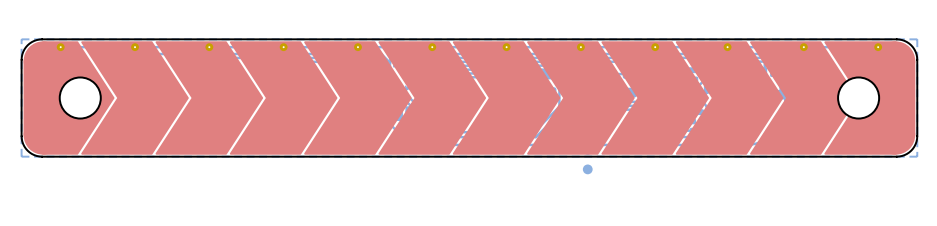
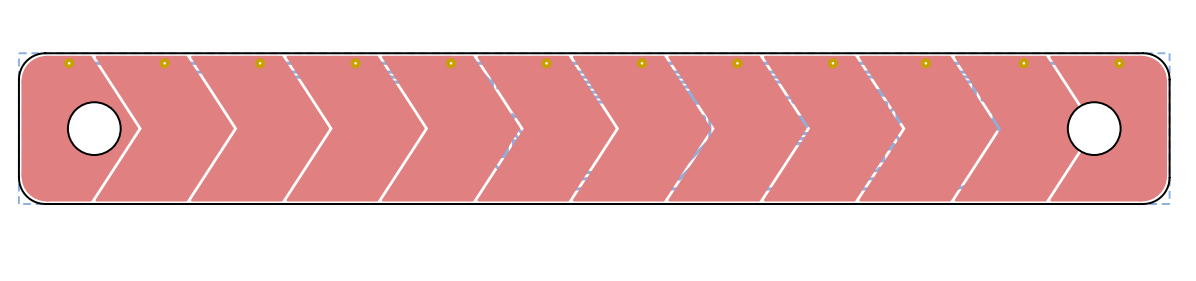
part: (587, 169) -> none

